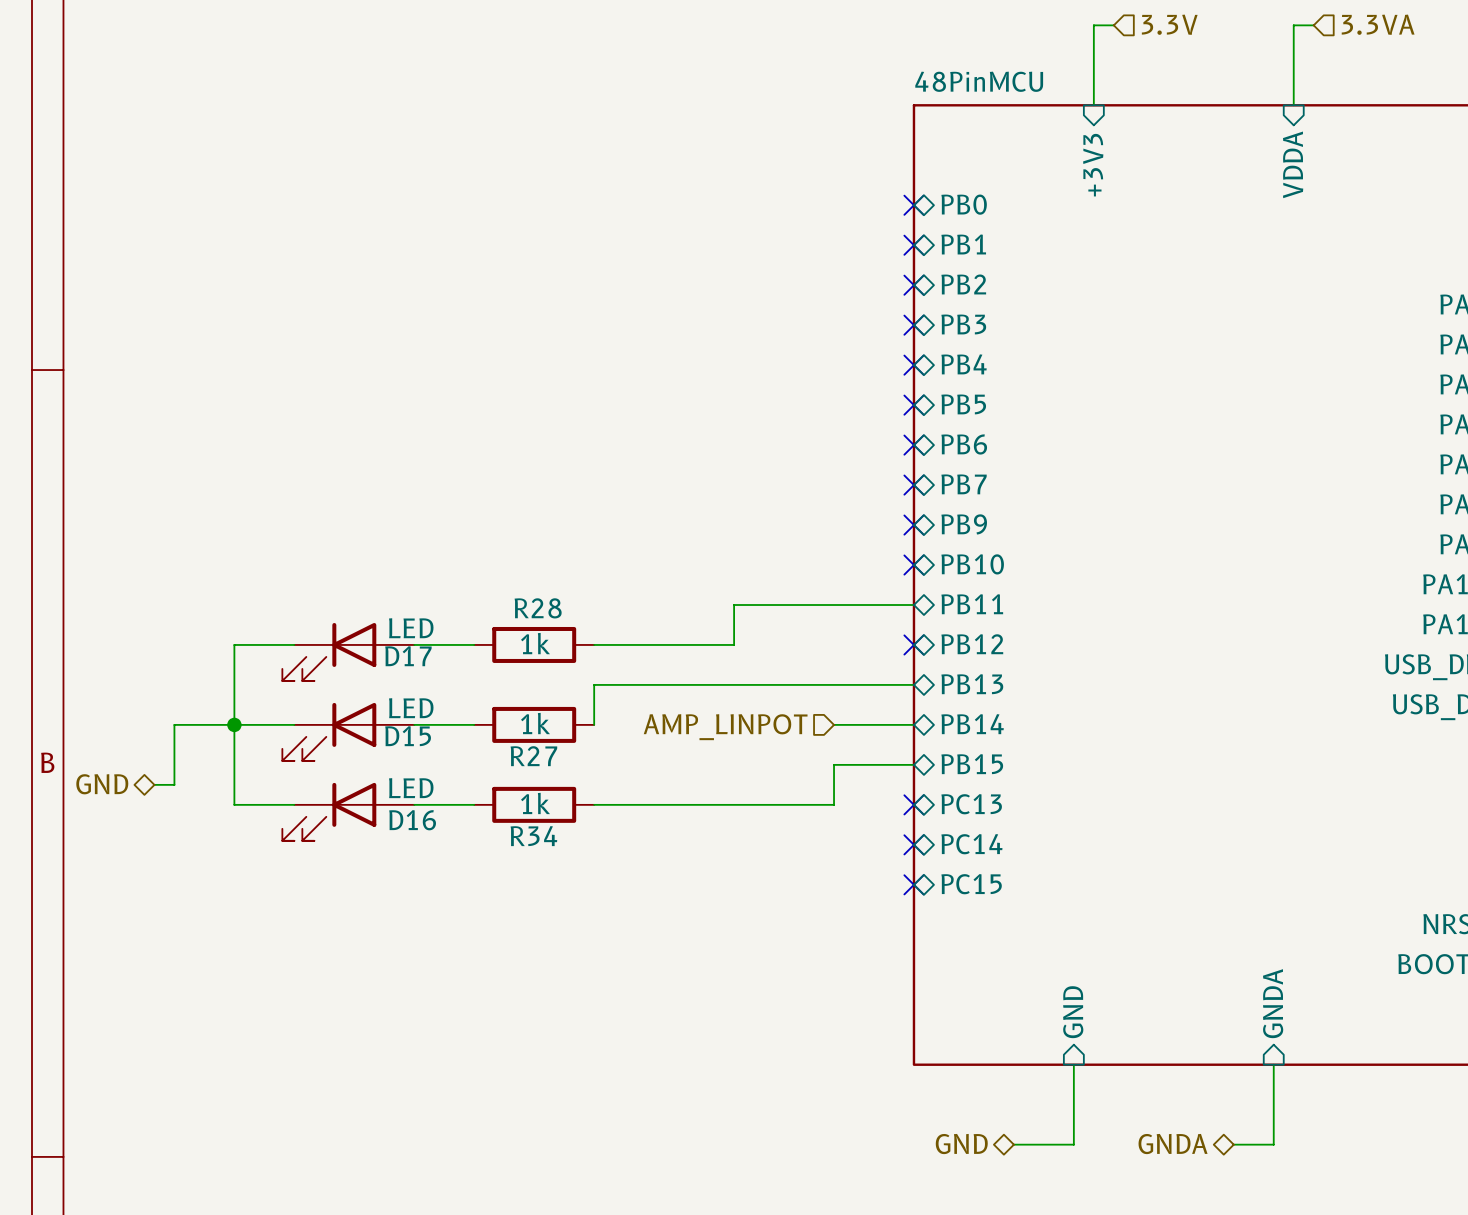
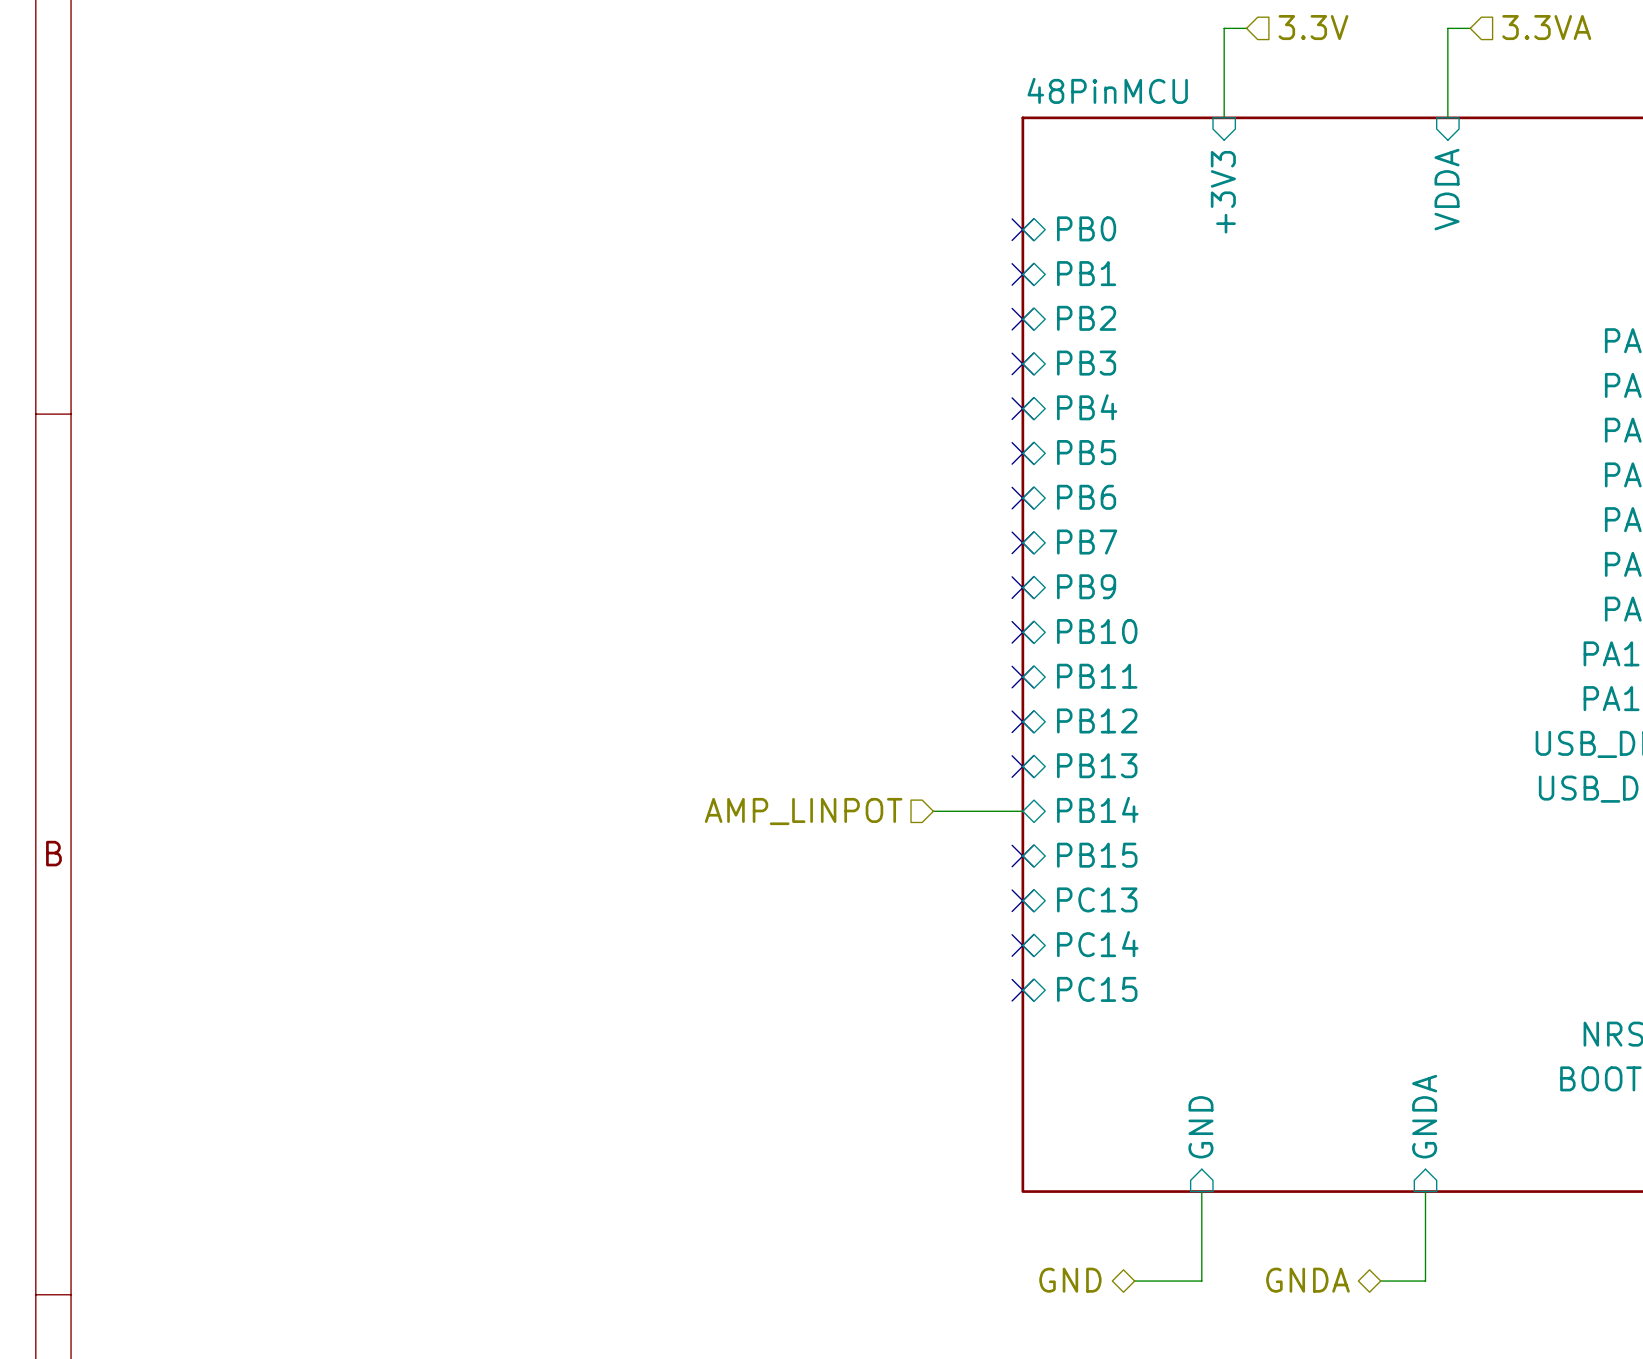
wire: (913, 604) (734, 604) (734, 644) (594, 644) -> none
no-connect mark: none -> (1022, 677)
wire: (294, 644) (234, 644) (234, 804) (294, 804) -> none
wire: (414, 644) (474, 644) -> none
R28: 1k (534, 644) -> none
D17: LED (348, 651) -> none
wire: (913, 684) (594, 684) (594, 724) -> none
no-connect mark: none -> (1022, 766)
junction: (234, 724) -> none
wire: (294, 724) (174, 724) (174, 784) (154, 784) -> none
wire: (414, 724) (474, 724) -> none
R27: 1k (534, 724) -> none
D15: LED (348, 731) -> none
wire: (913, 764) (834, 764) (834, 804) (594, 804) -> none
no-connect mark: none -> (1022, 856)
hierarchical label: GND (102, 784) -> none
wire: (414, 804) (474, 804) -> none
R34: 1k (534, 804) -> none
D16: LED (348, 811) -> none

